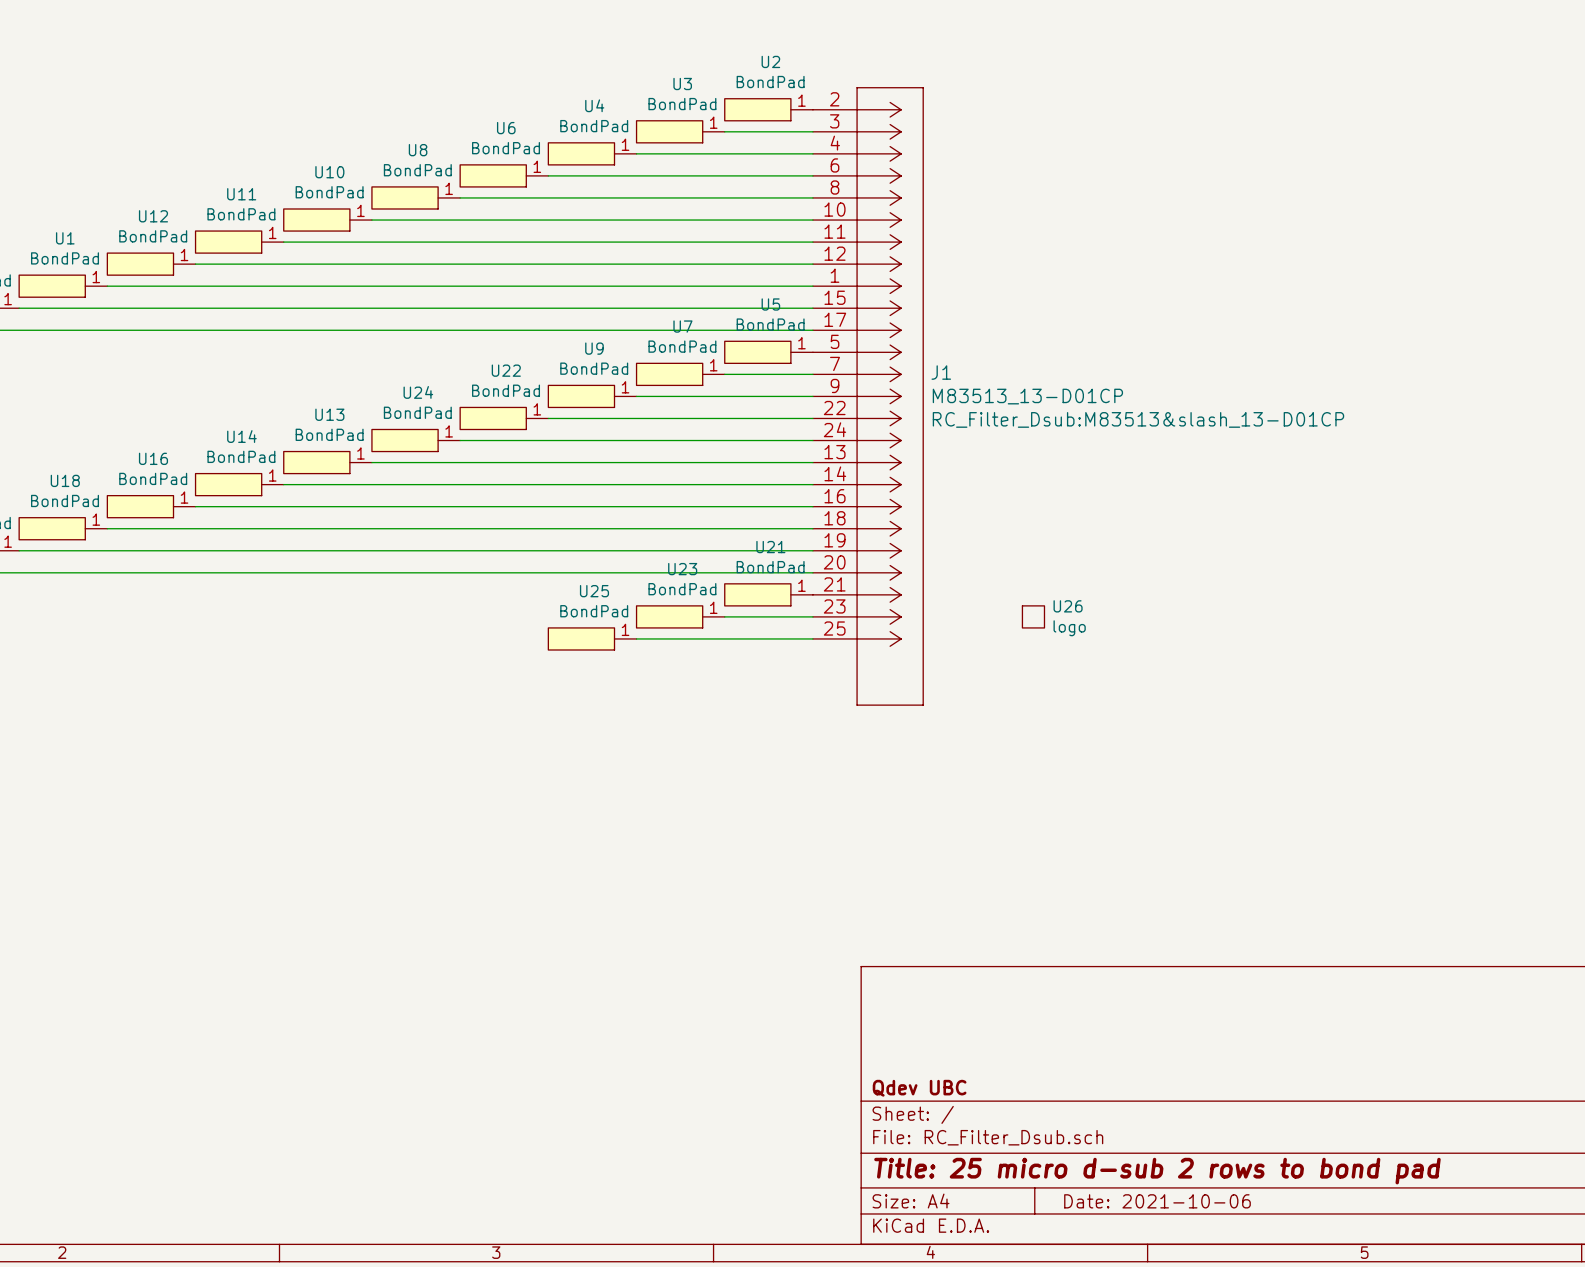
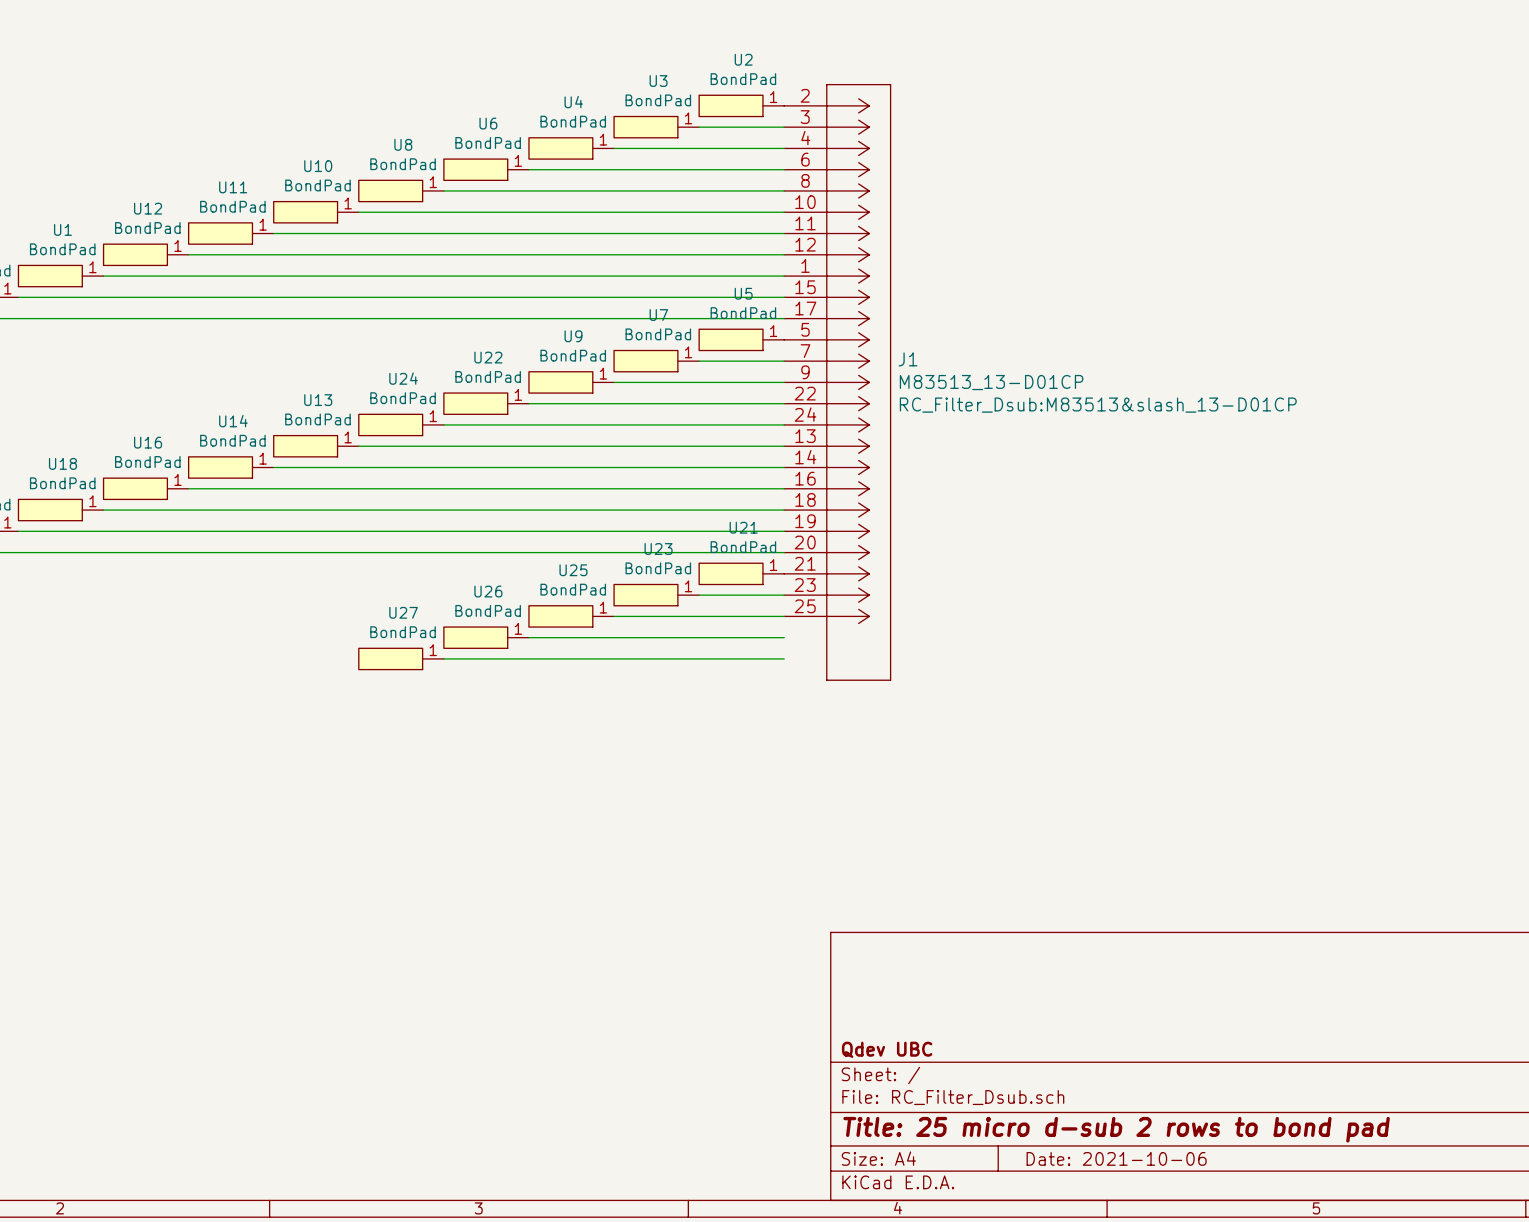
U26 symbol: [1022, 605, 1045, 628] -> [443, 627, 529, 649]
U26 name position: U26 (1068, 606) -> U26 (488, 591)
U26 value: logo (1069, 628) -> BondPad (488, 610)
wire: none -> (528, 637) (784, 637)
U27: none -> BondPad (401, 658)
wire: none -> (443, 658) (784, 658)

